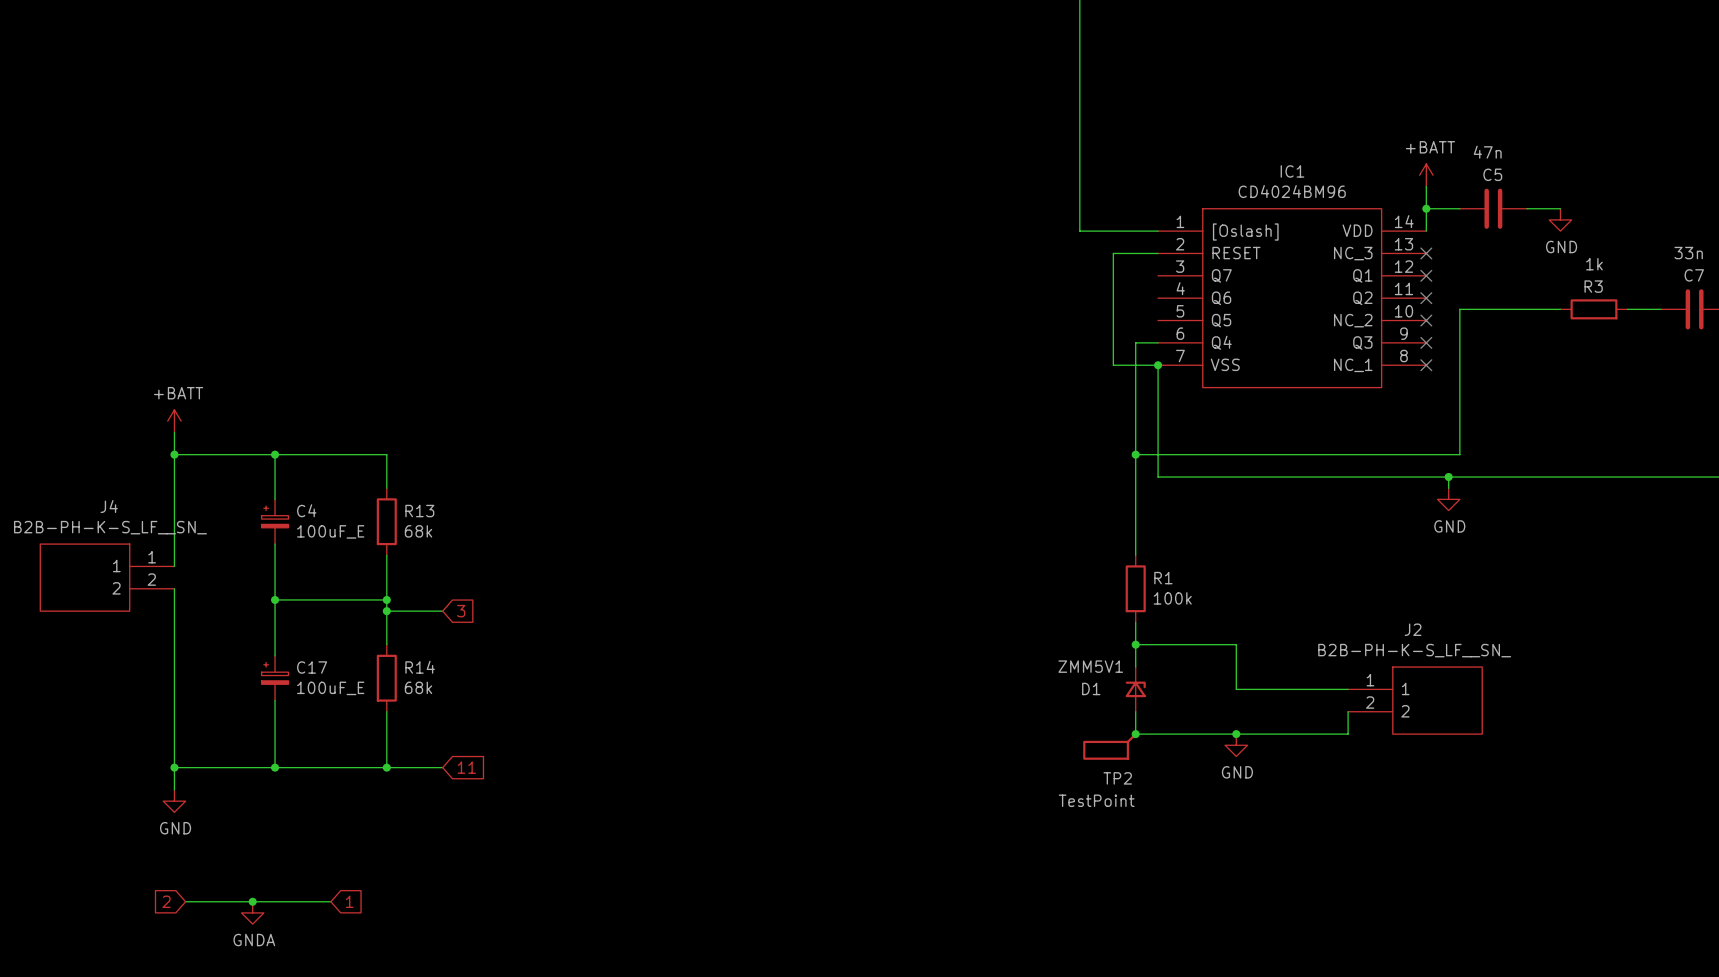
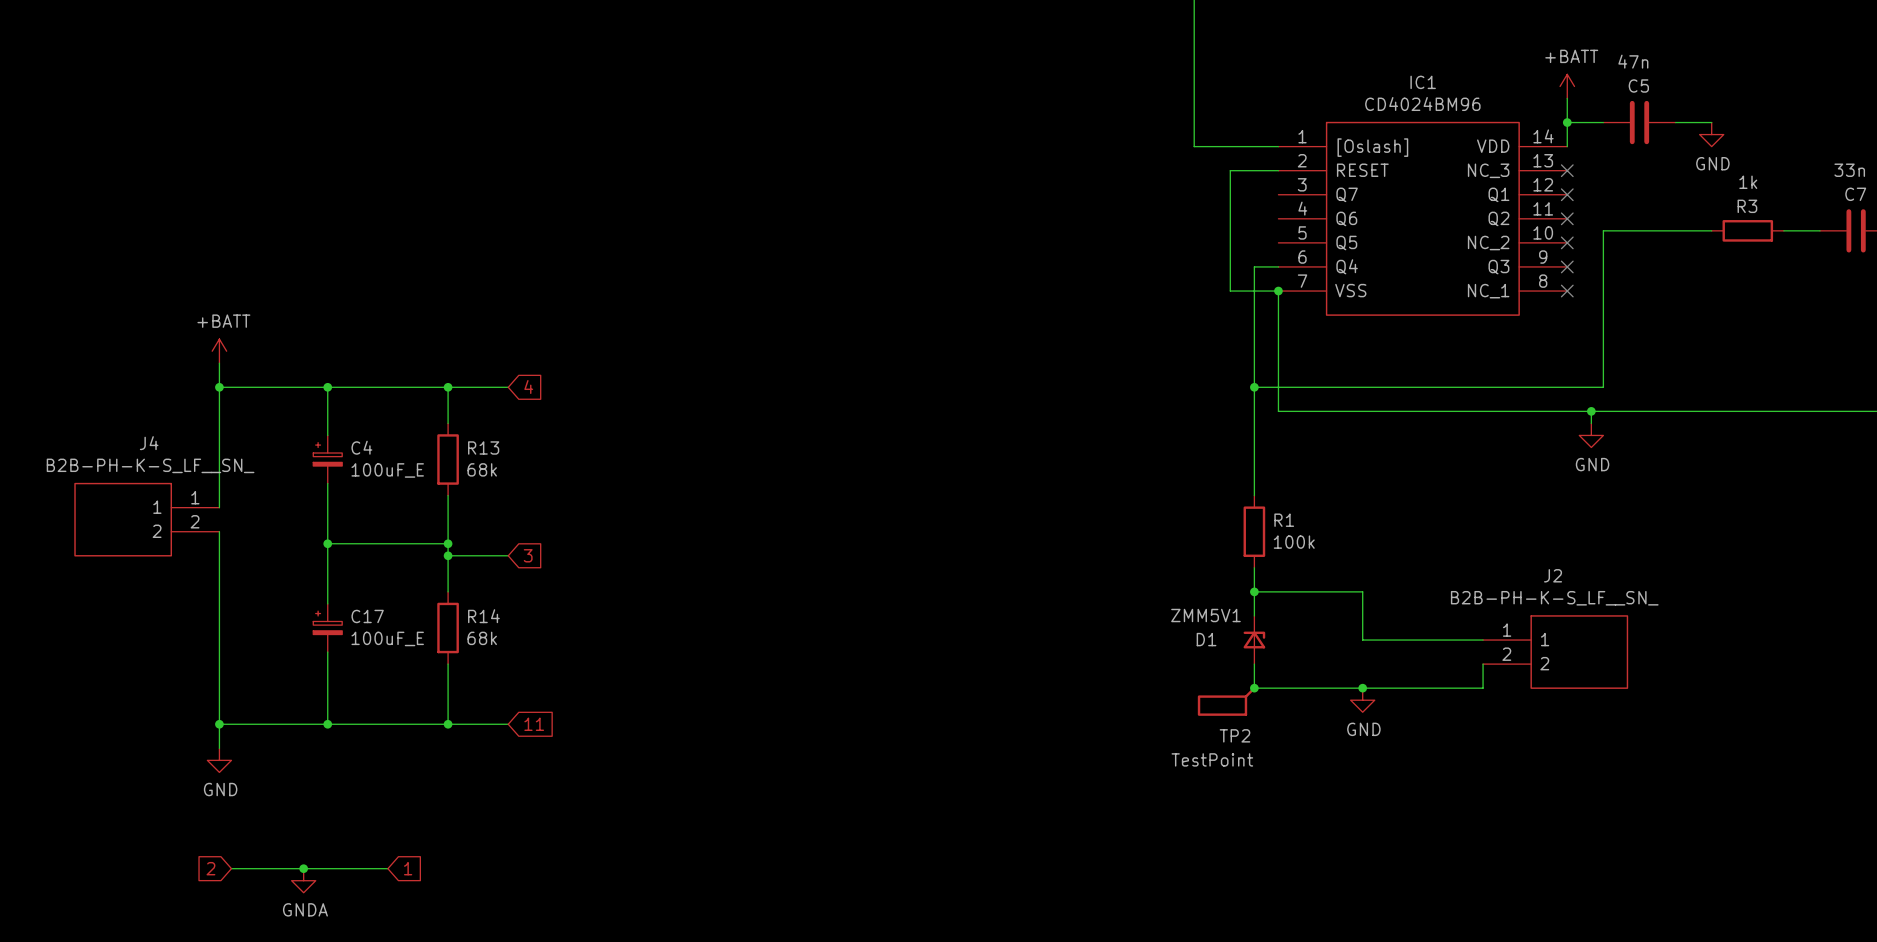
wire: none -> (448, 387) (508, 387)
junction: none -> (448, 387)
global label: none -> 4 (528, 387)

